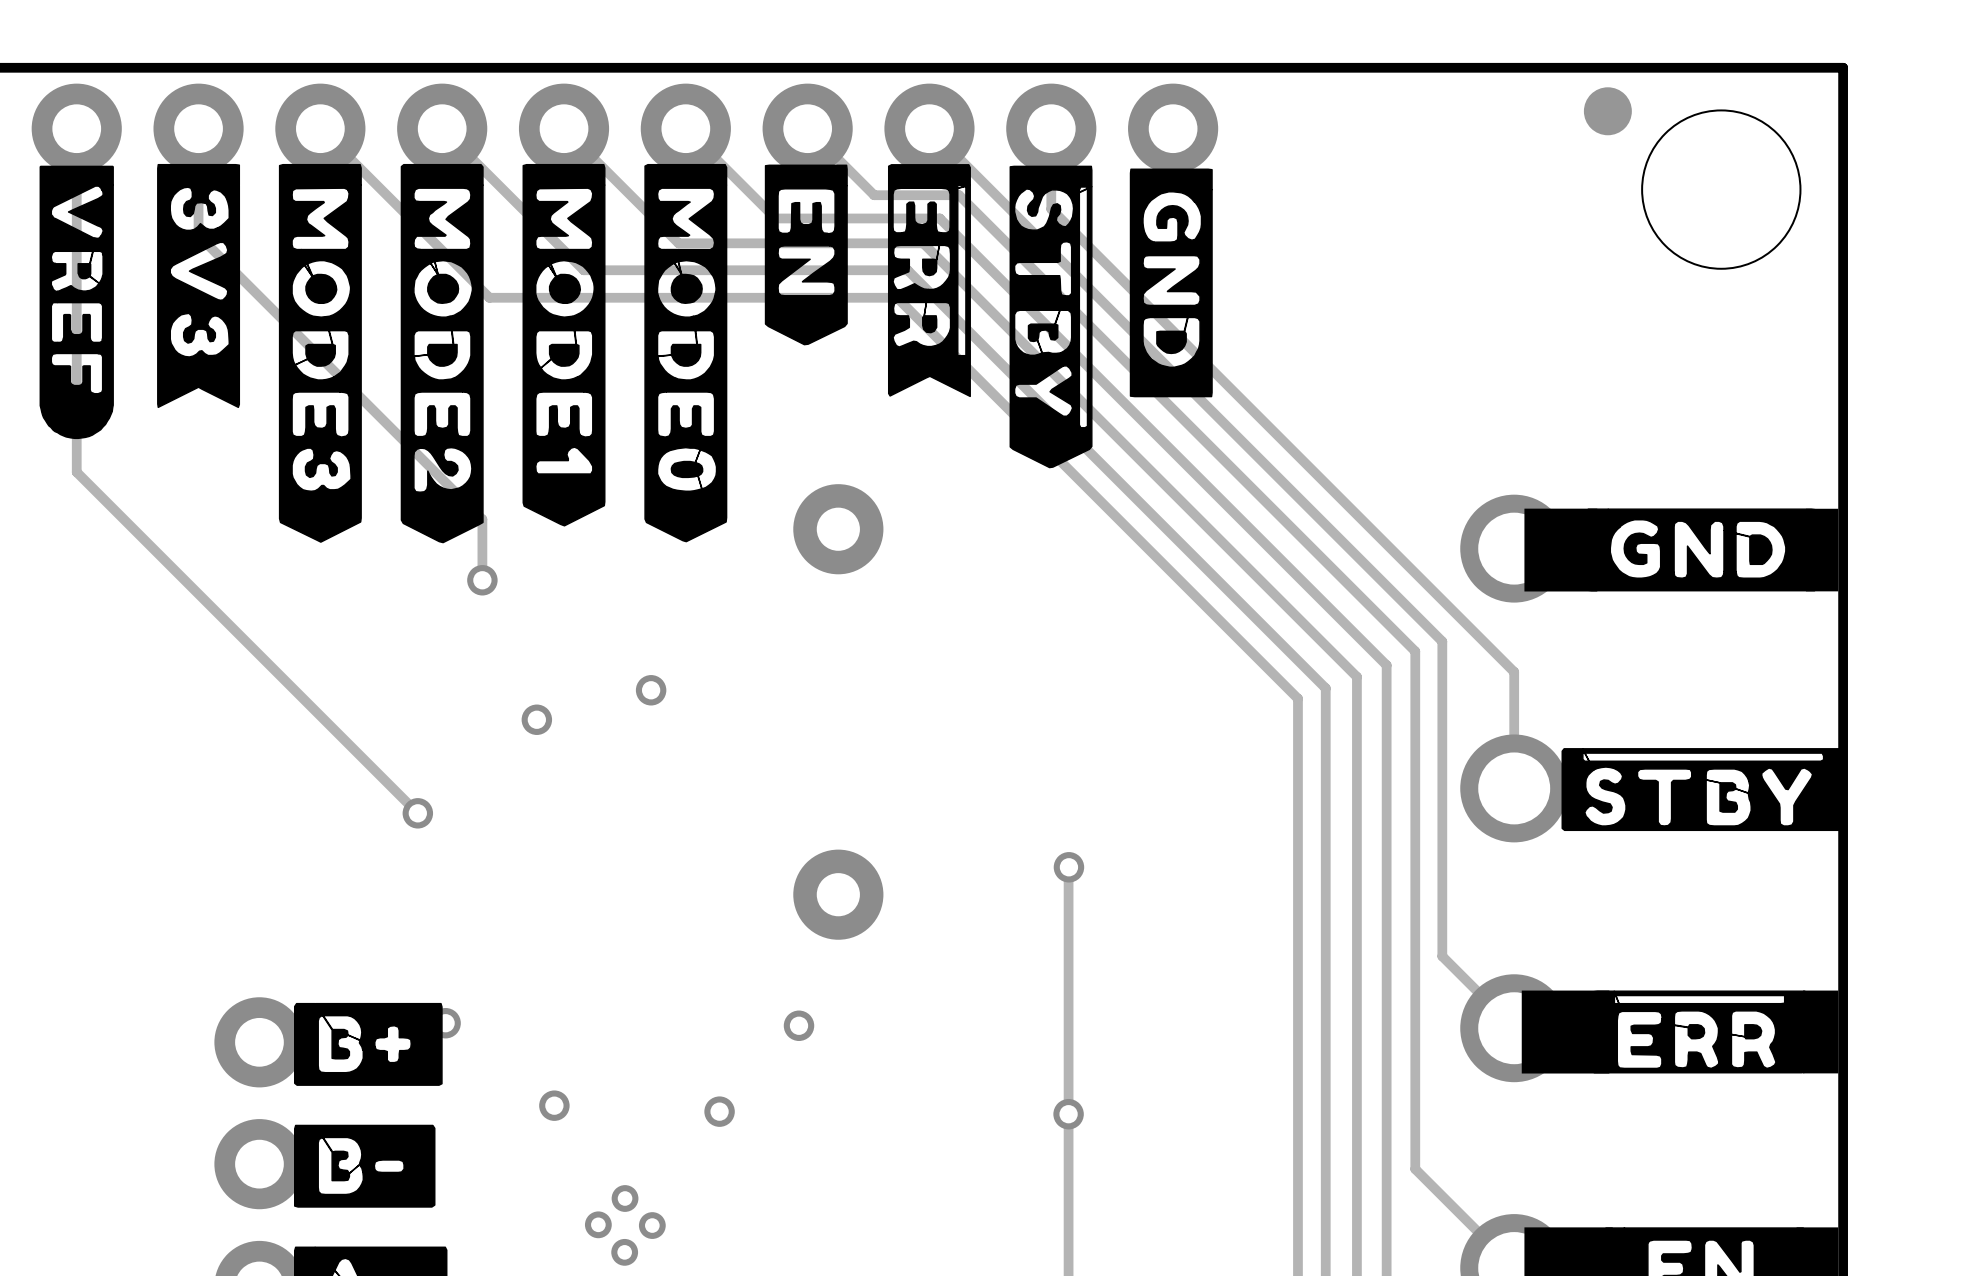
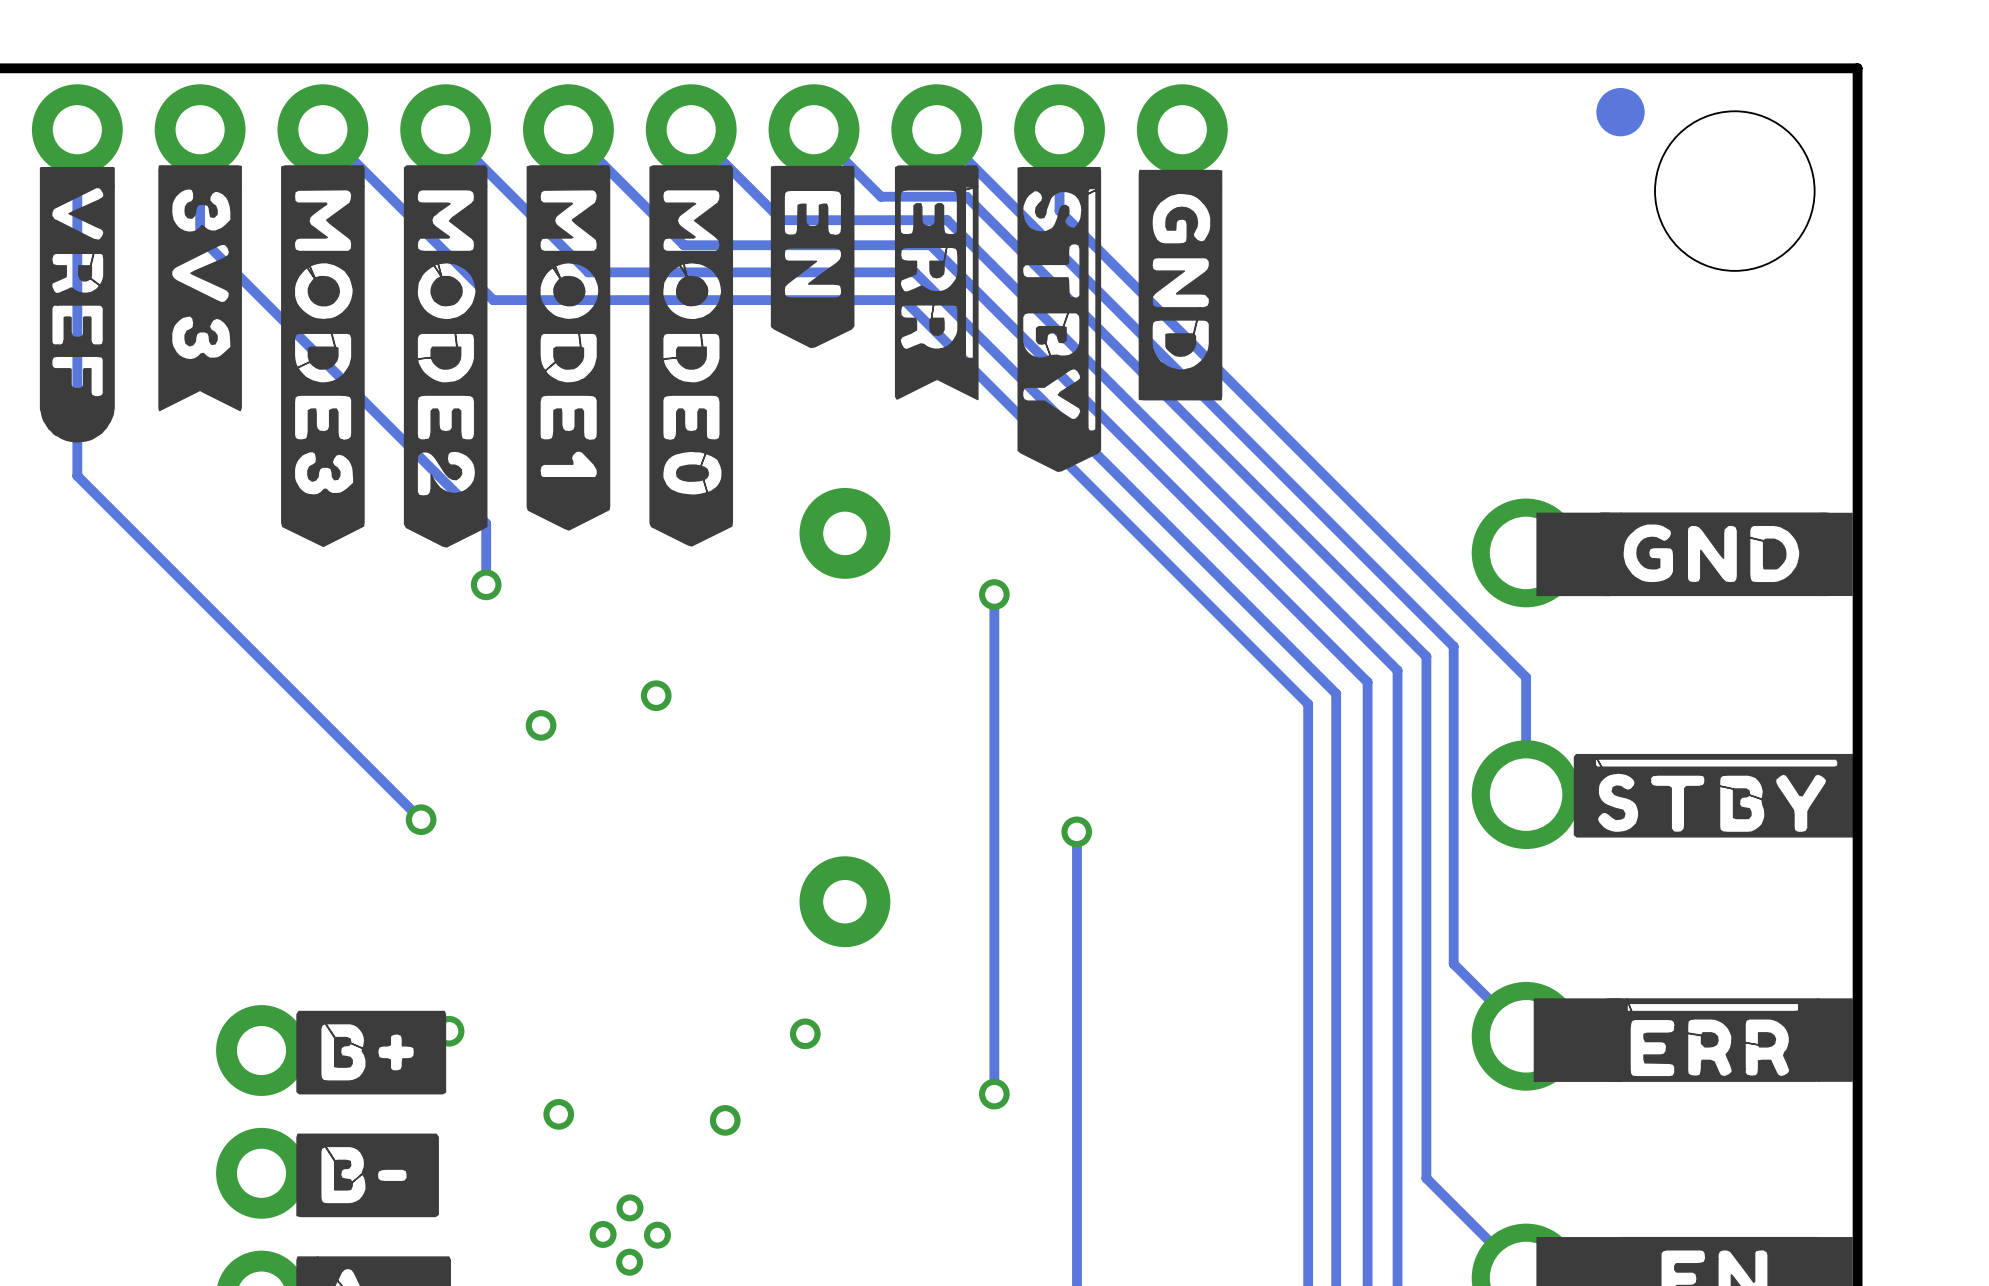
track: none -> (994, 594) (994, 1094)
via: none -> (994, 594)
track: none -> (1076, 832) (1076, 874)
via position: (1068, 867) -> (1076, 831)
via position: (1068, 1114) -> (994, 1094)

